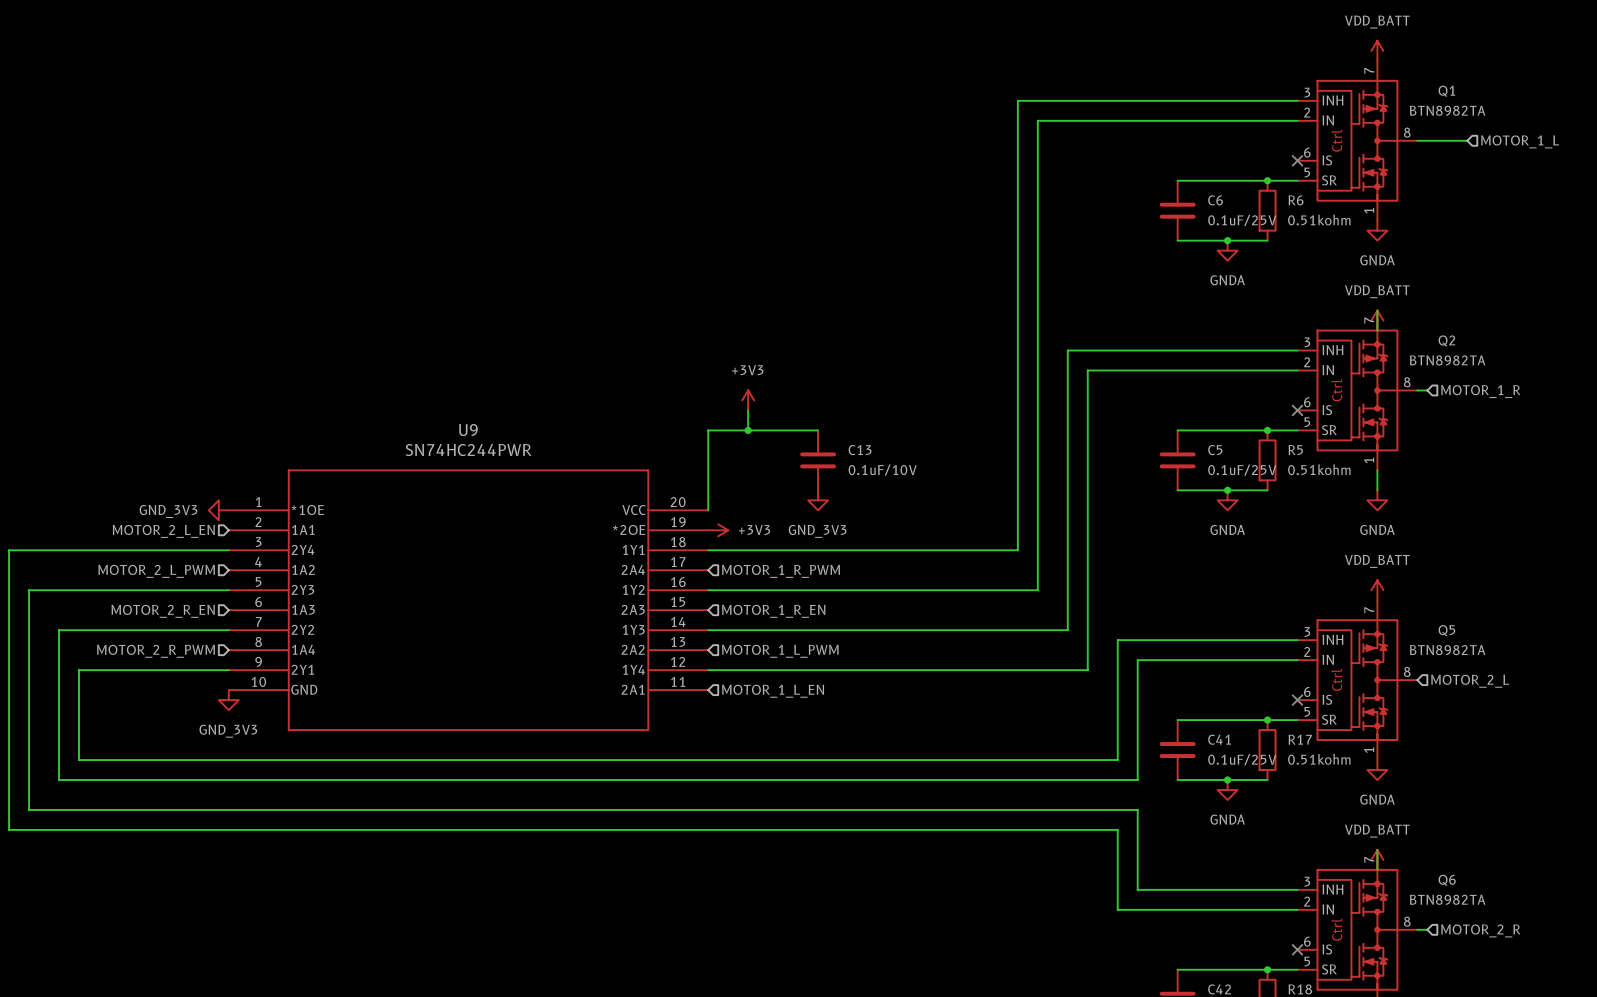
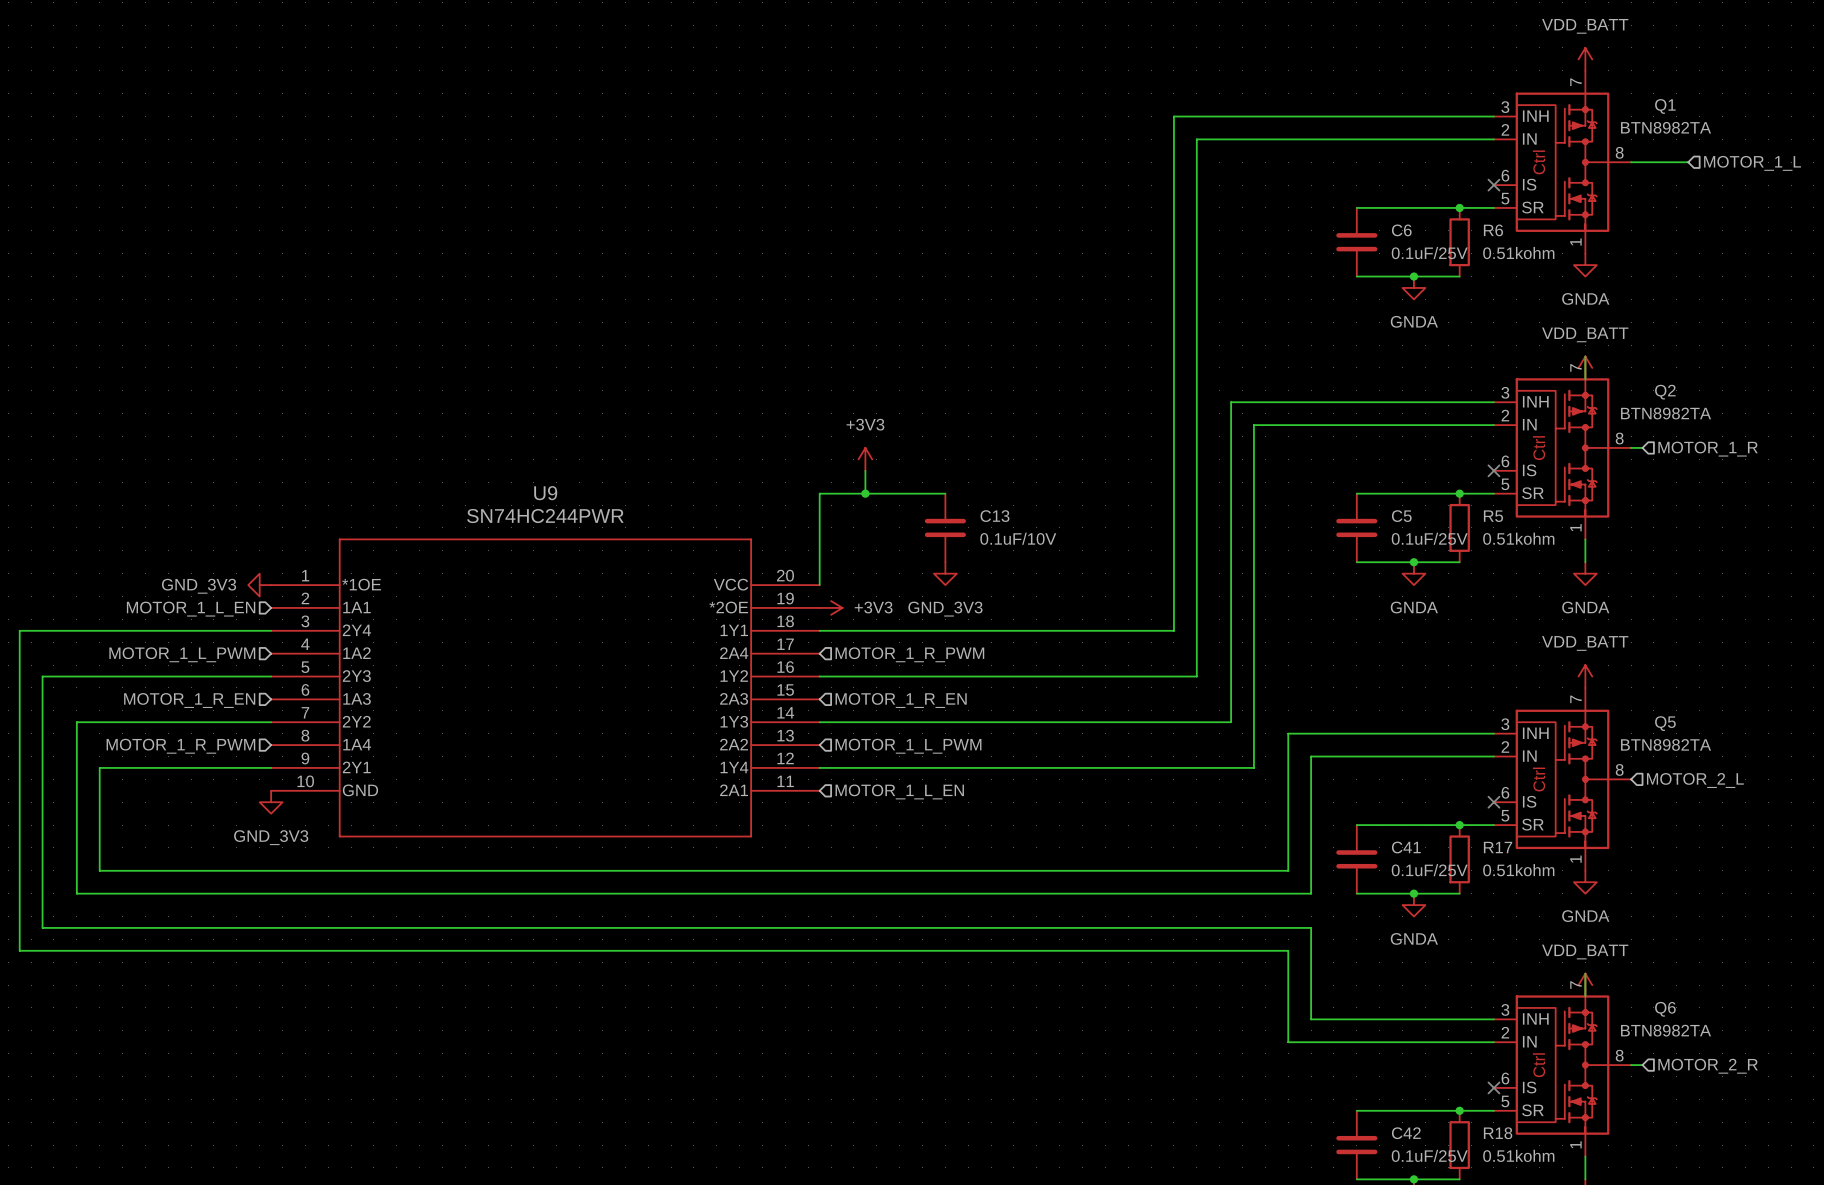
hierarchical label: MOTOR_2_L_EN (163, 531) -> MOTOR_1_L_EN (191, 609)
hierarchical label: MOTOR_2_L_PWM (156, 571) -> MOTOR_1_L_PWM (182, 654)
hierarchical label: MOTOR_2_R_EN (163, 611) -> MOTOR_1_R_EN (189, 700)
hierarchical label: MOTOR_2_R_PWM (155, 651) -> MOTOR_1_R_PWM (180, 746)

